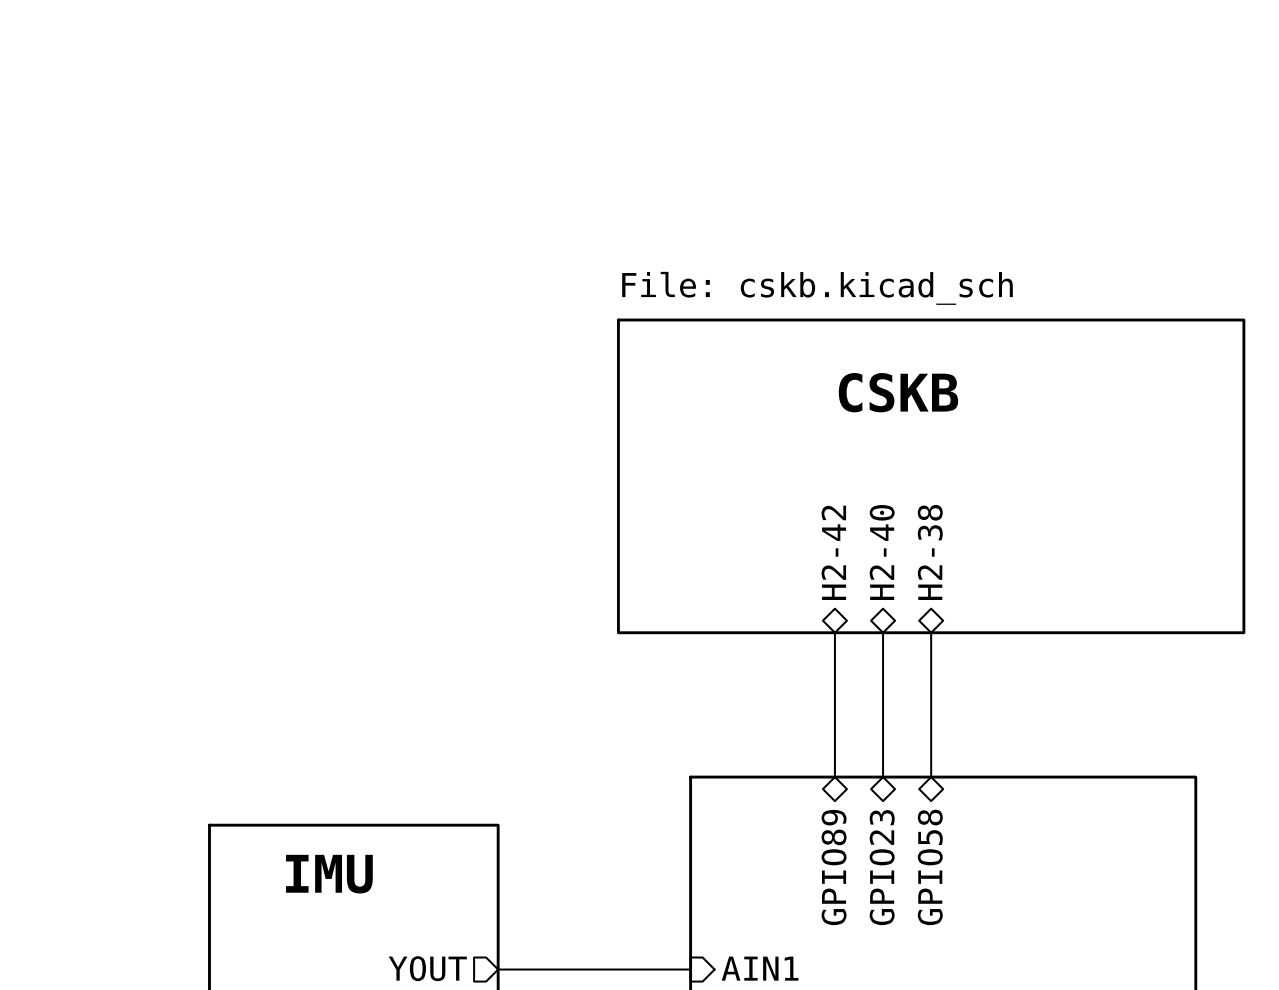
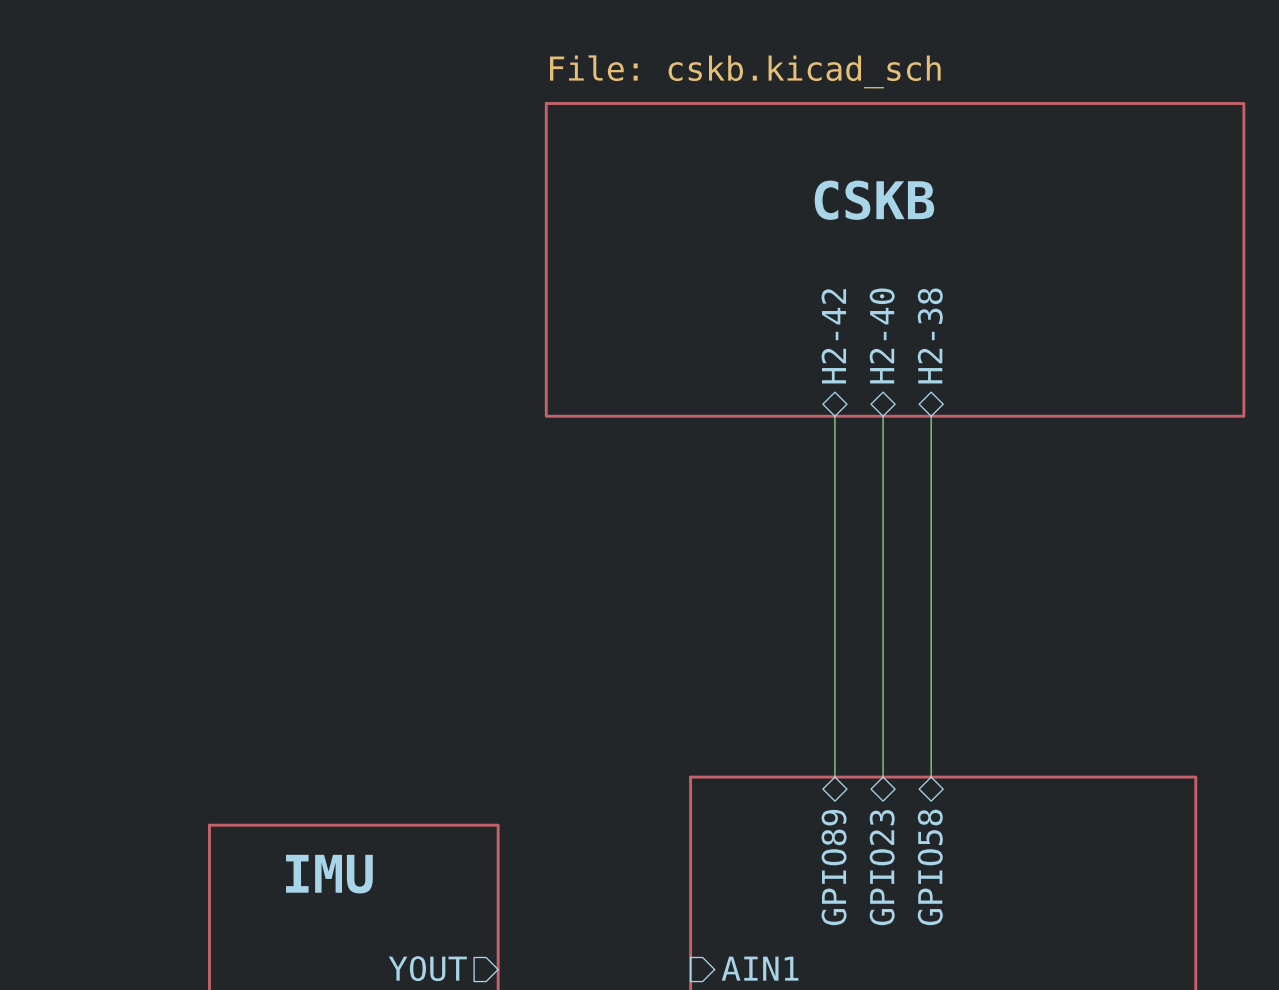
sheet CSKB: none -> File: cskb.kicad_sch (895, 259)
wire: none -> (834, 416) (834, 632)
wire: none -> (883, 416) (883, 632)
wire: none -> (931, 416) (931, 632)
sheet CSKB: File: cskb.kicad_sch (931, 476) -> none
sheet pin position: H2-42 (833, 552) -> H2-42 (833, 336)
sheet pin position: H2-40 (882, 552) -> H2-40 (882, 335)
sheet pin position: H2-38 (930, 552) -> H2-38 (930, 335)
wire: (498, 969) (690, 969) -> none

